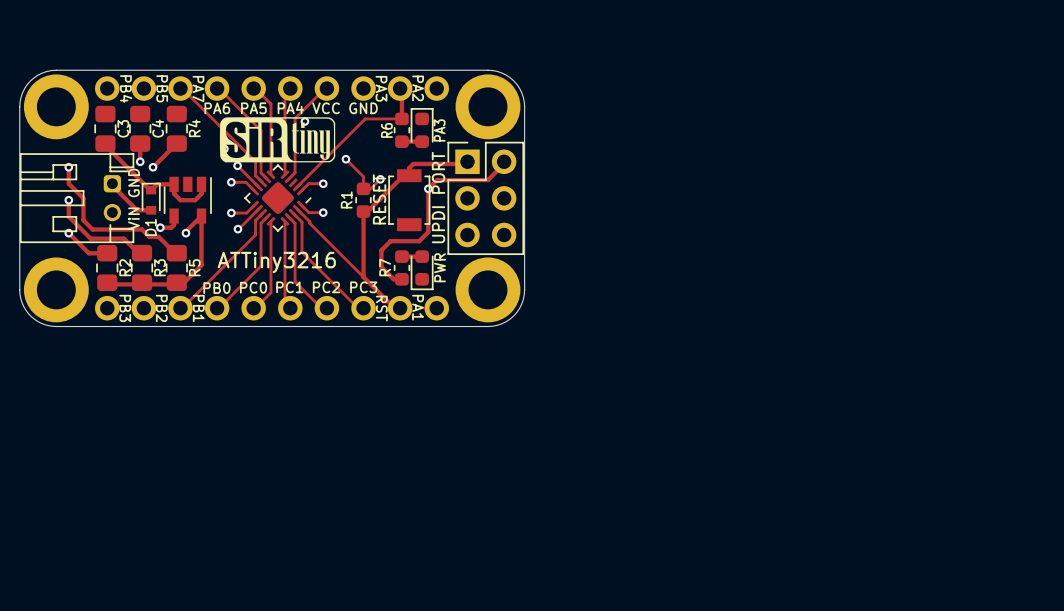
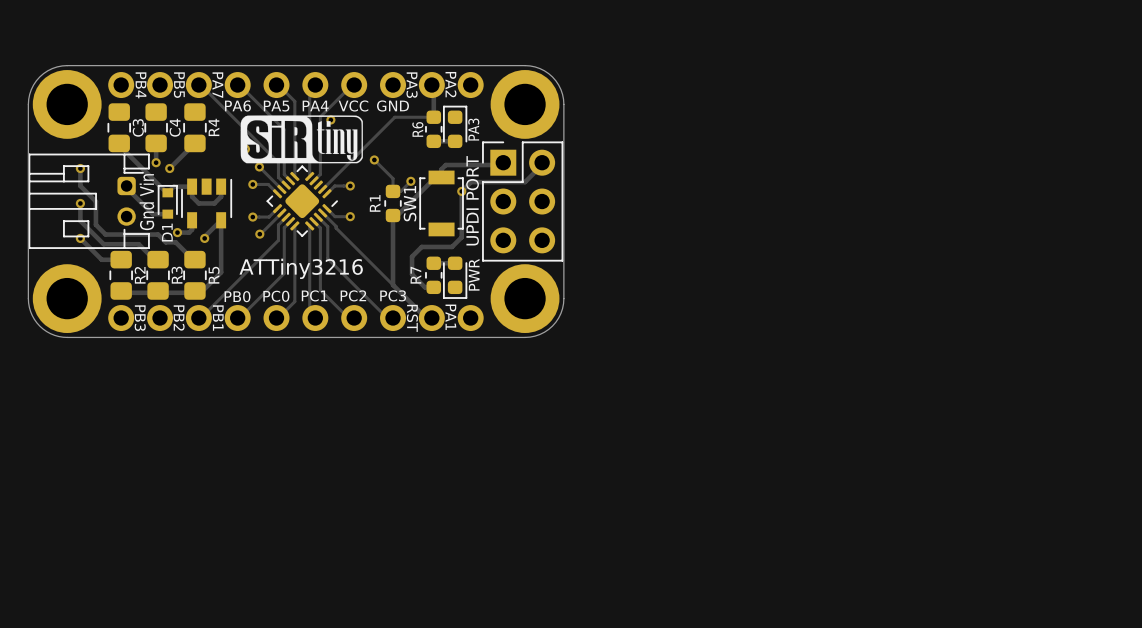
ViN GND name: ViN GND (133, 199) -> Gnd Vin (146, 202)
RESET name: RESET (379, 199) -> SW1 (410, 203)

